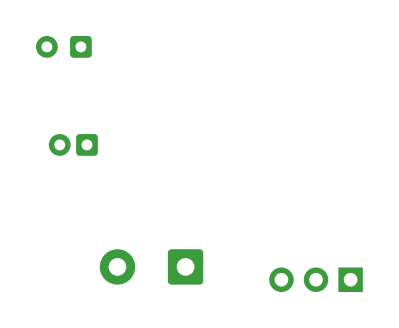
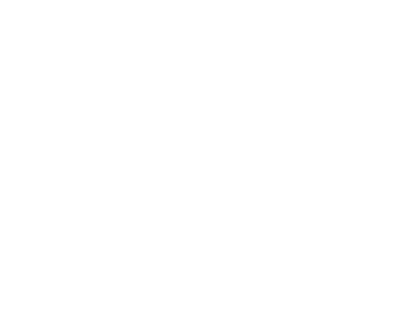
part: (63, 46) -> none
part: (73, 144) -> none
part: (151, 266) -> none
part: (316, 279) -> none

